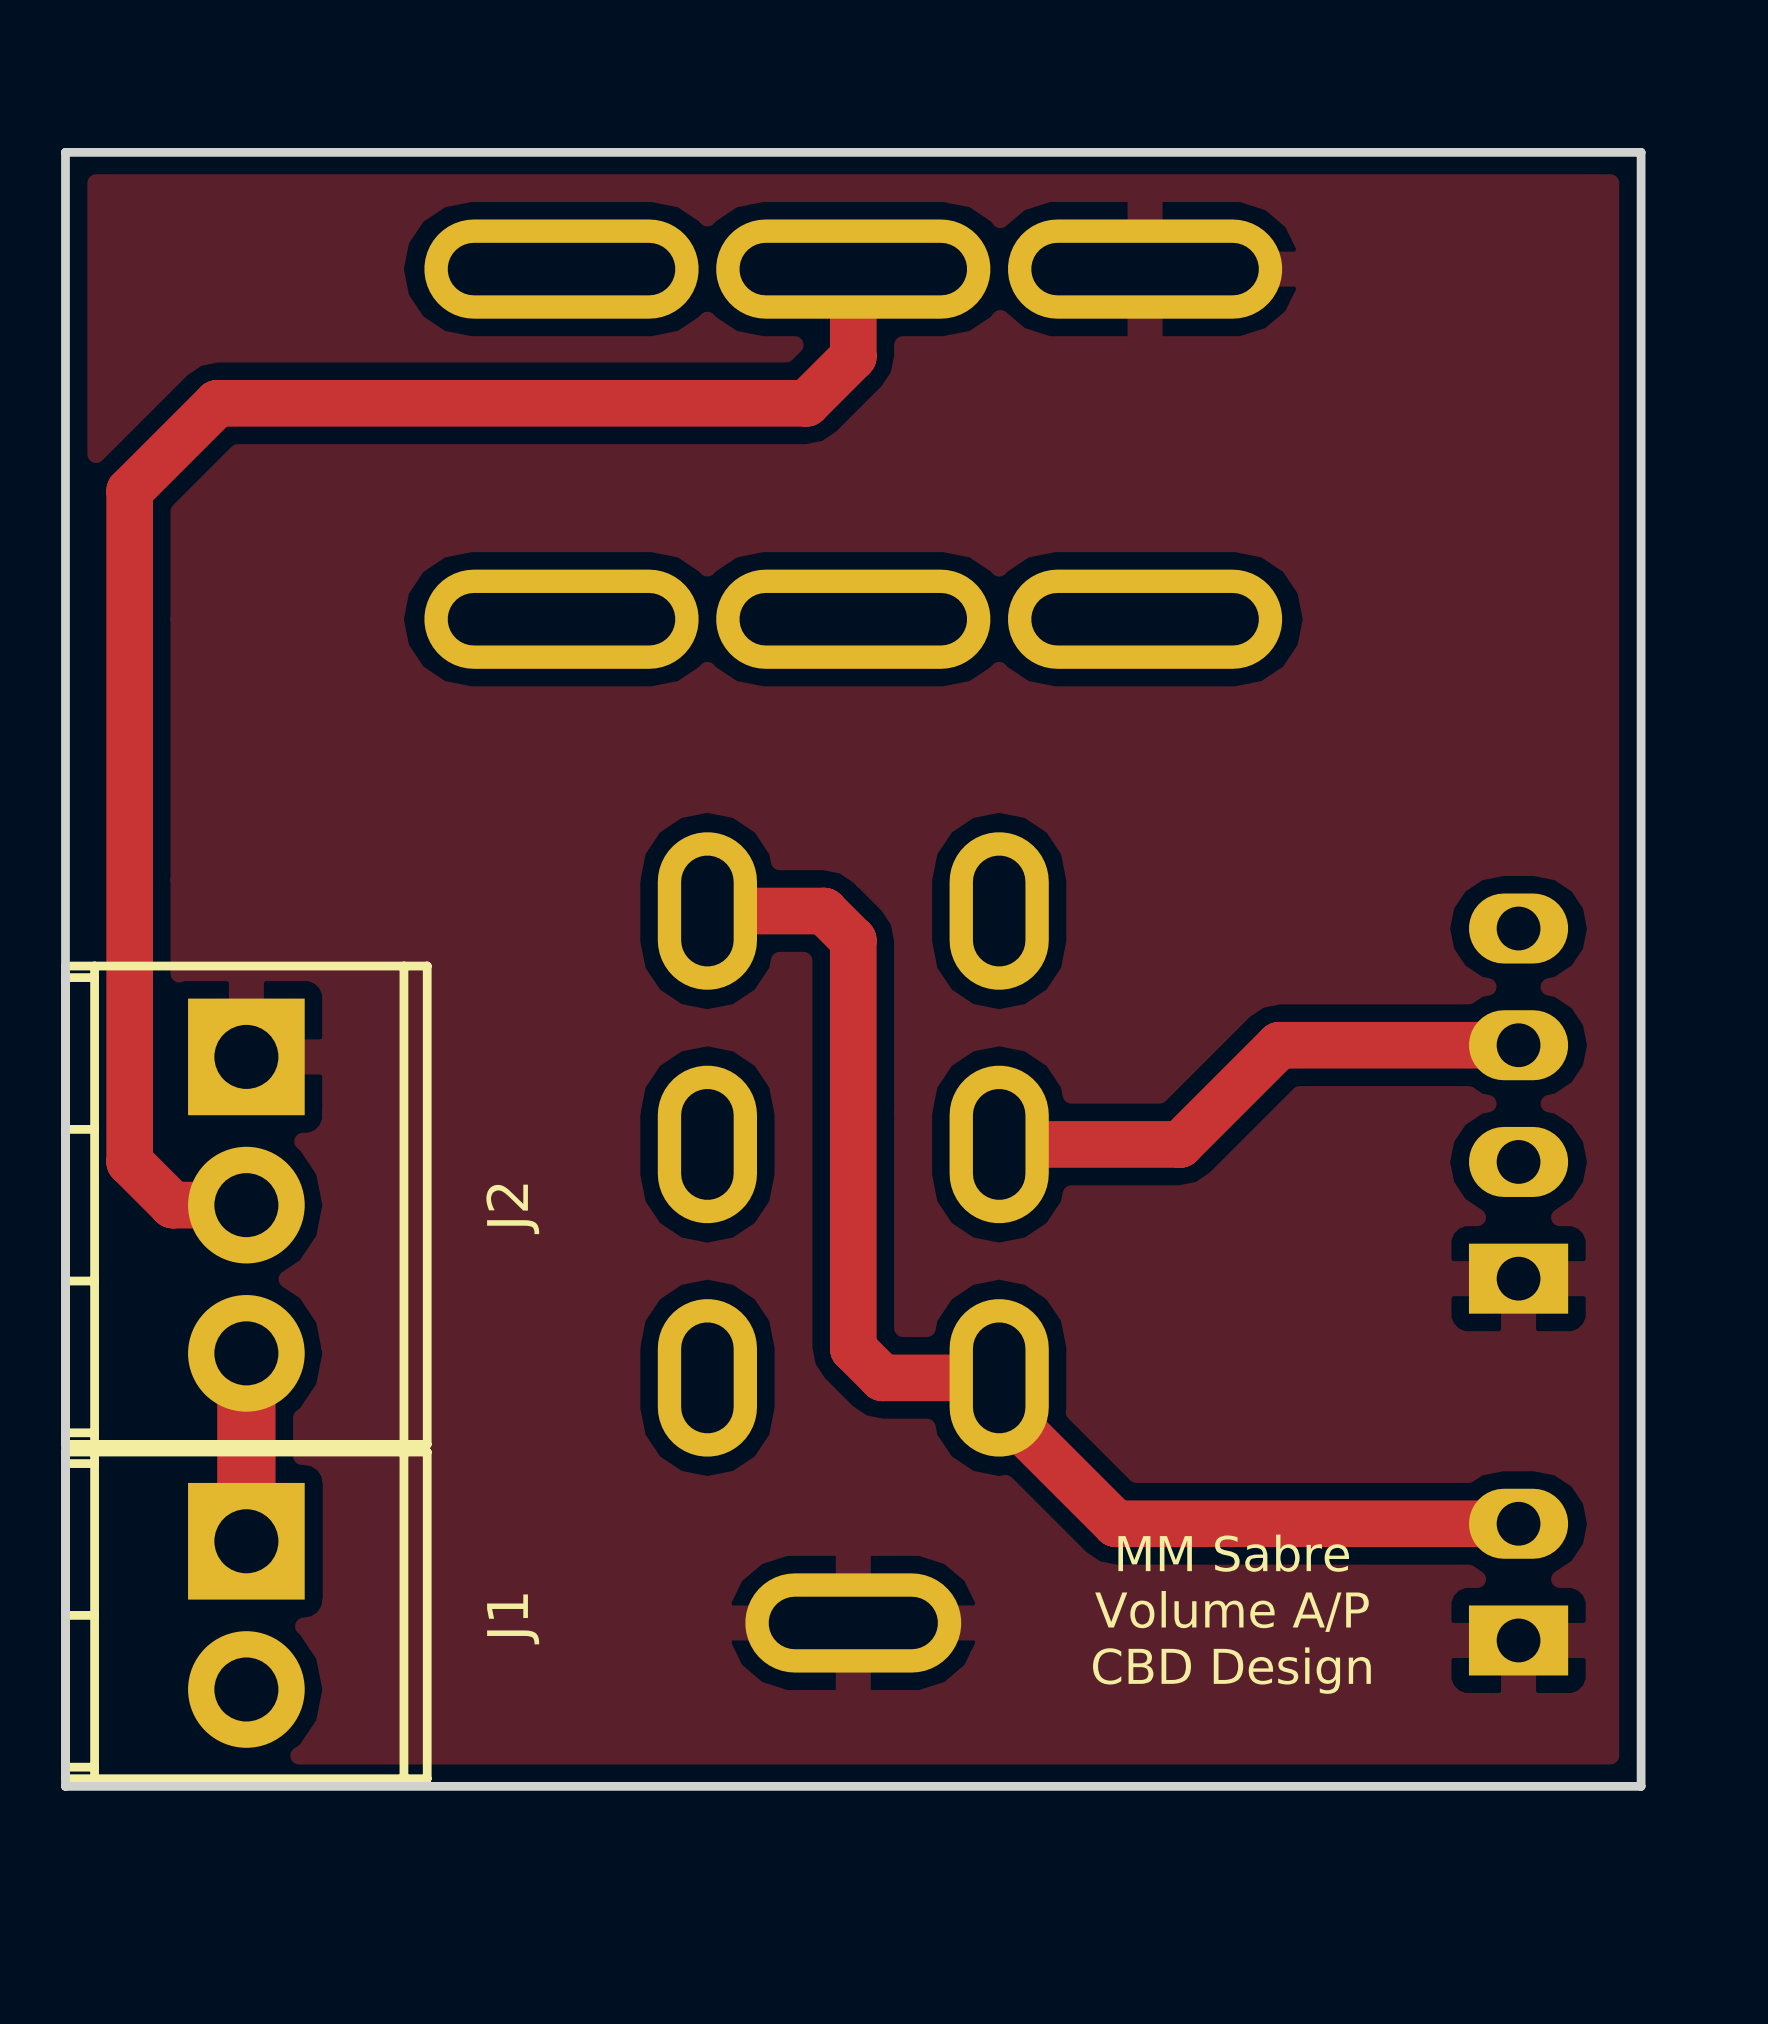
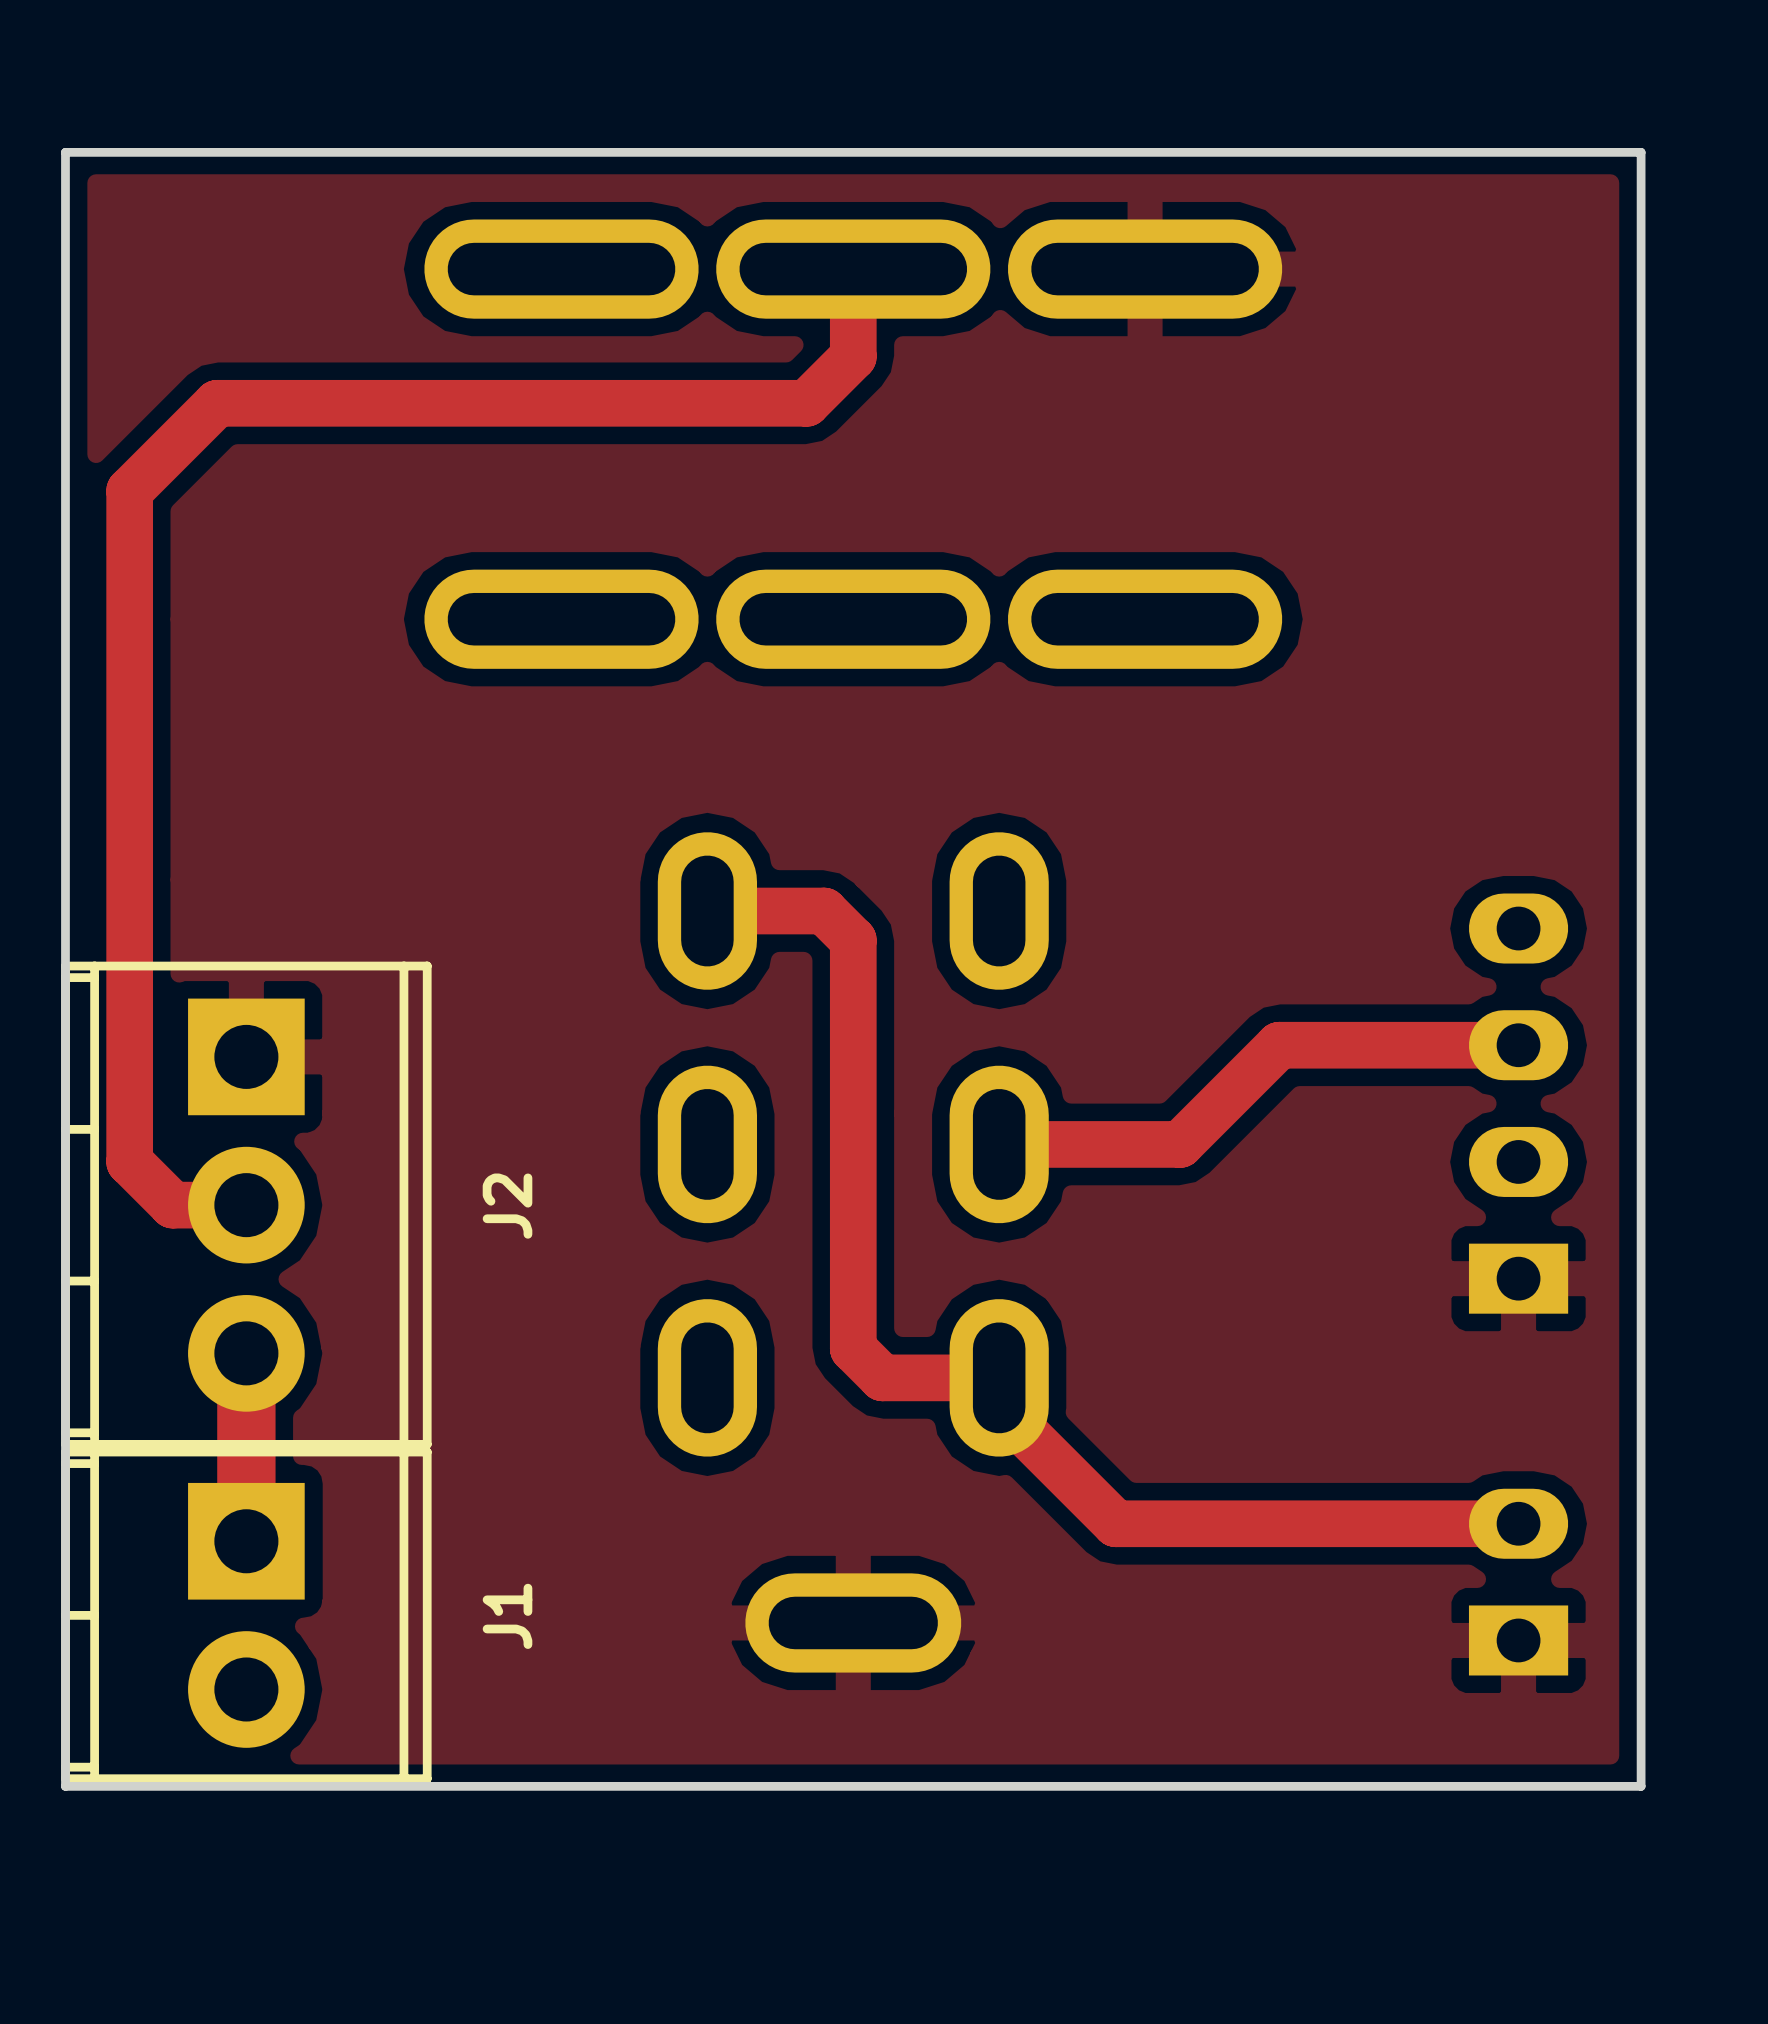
text: MM Sabre (1233, 1553) -> none
text: Volume A/P (1231, 1611) -> none
text: CBD Design (1231, 1670) -> none

